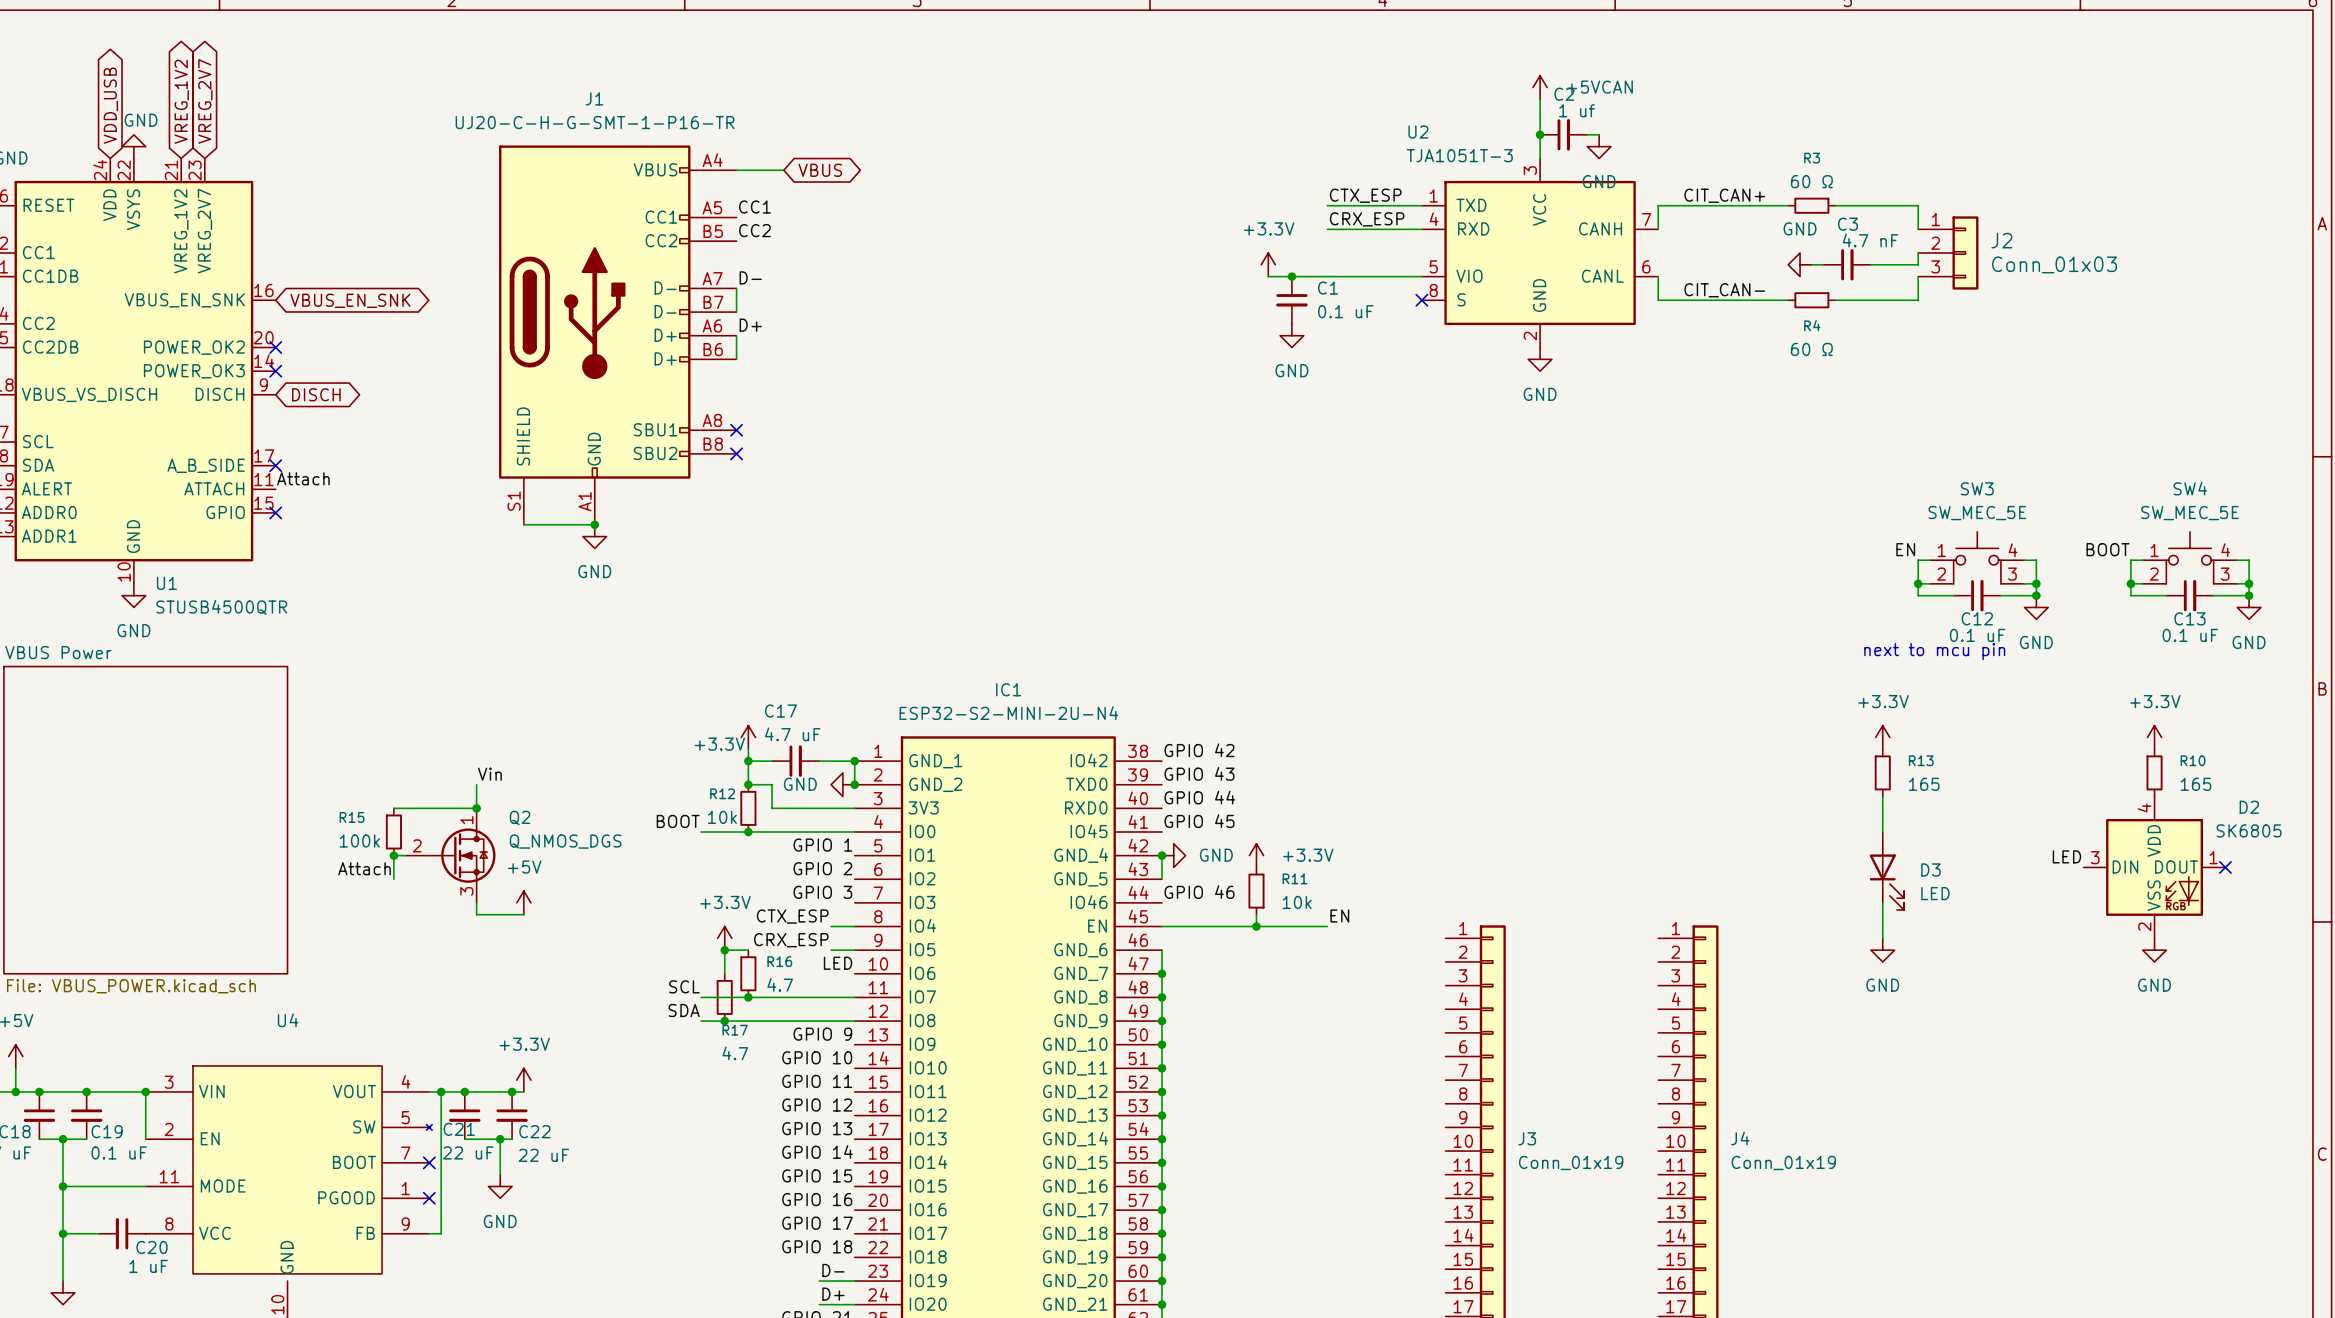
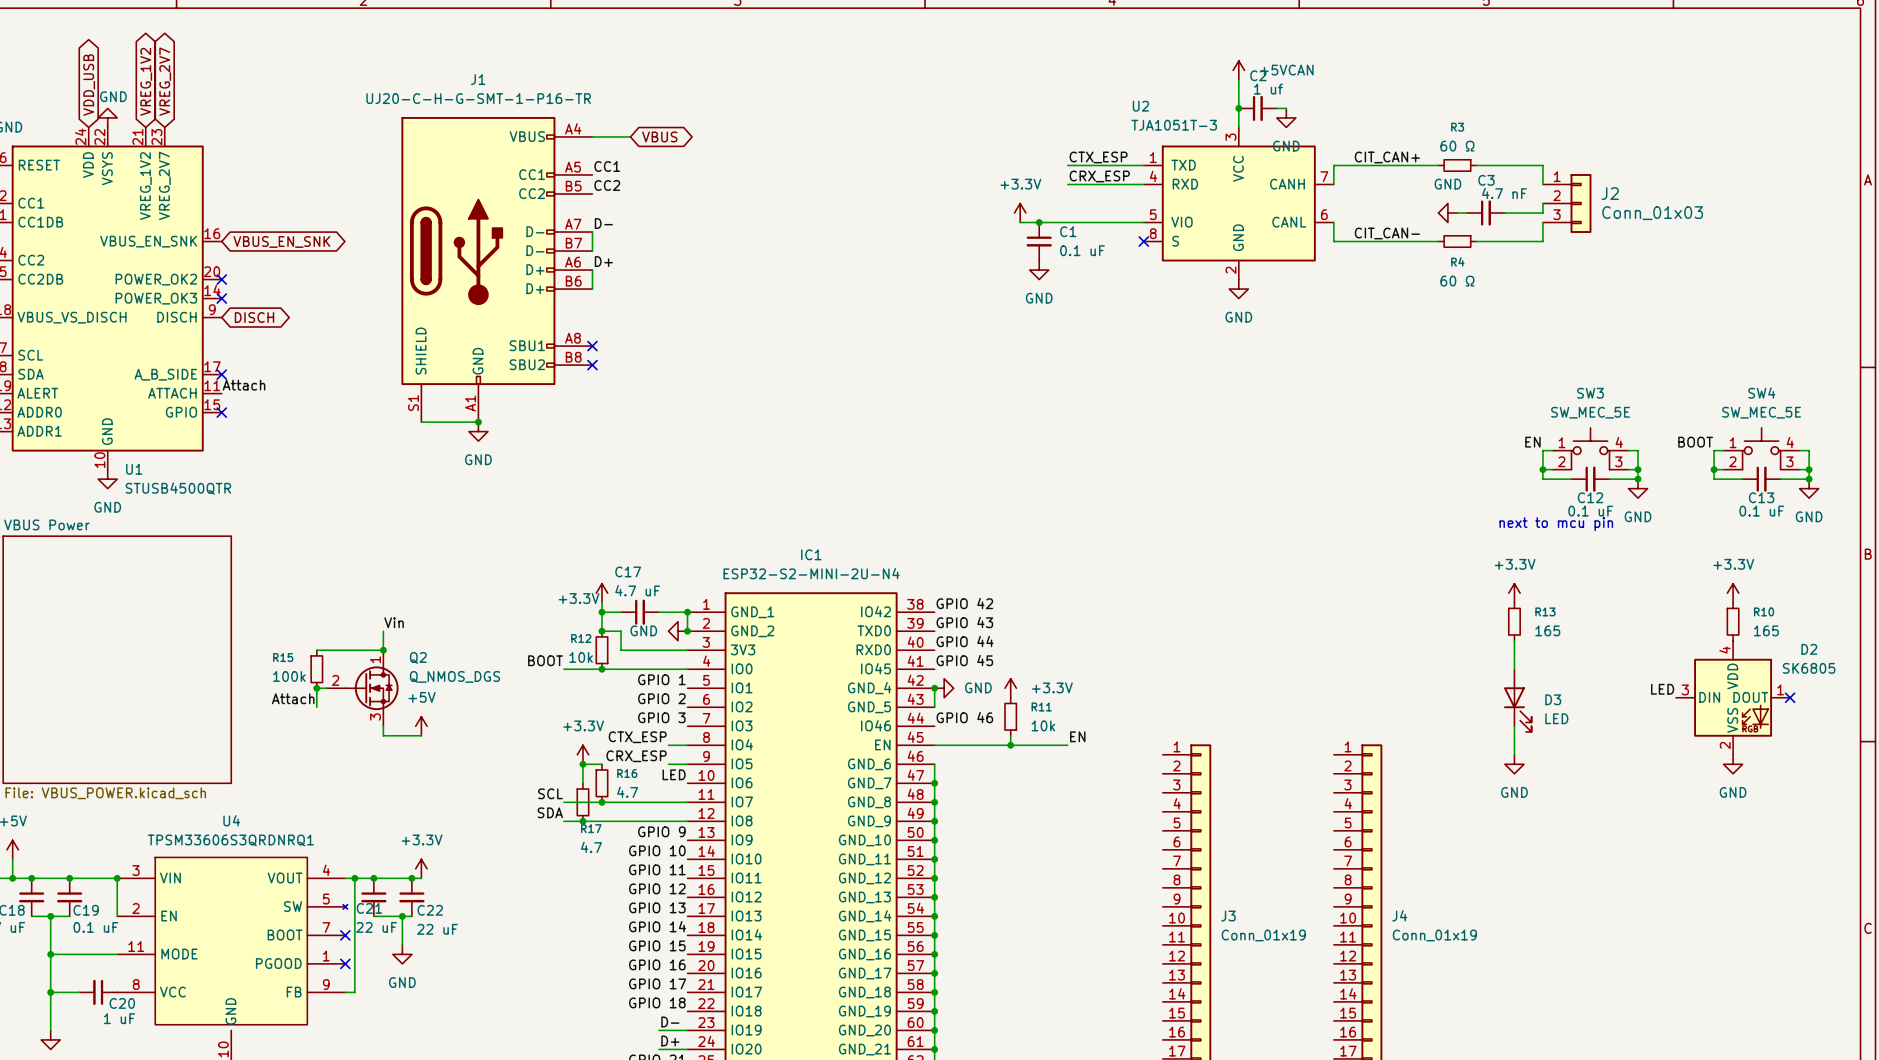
U4 value: none -> TPSM33606S3QRDNRQ1 (230, 840)

